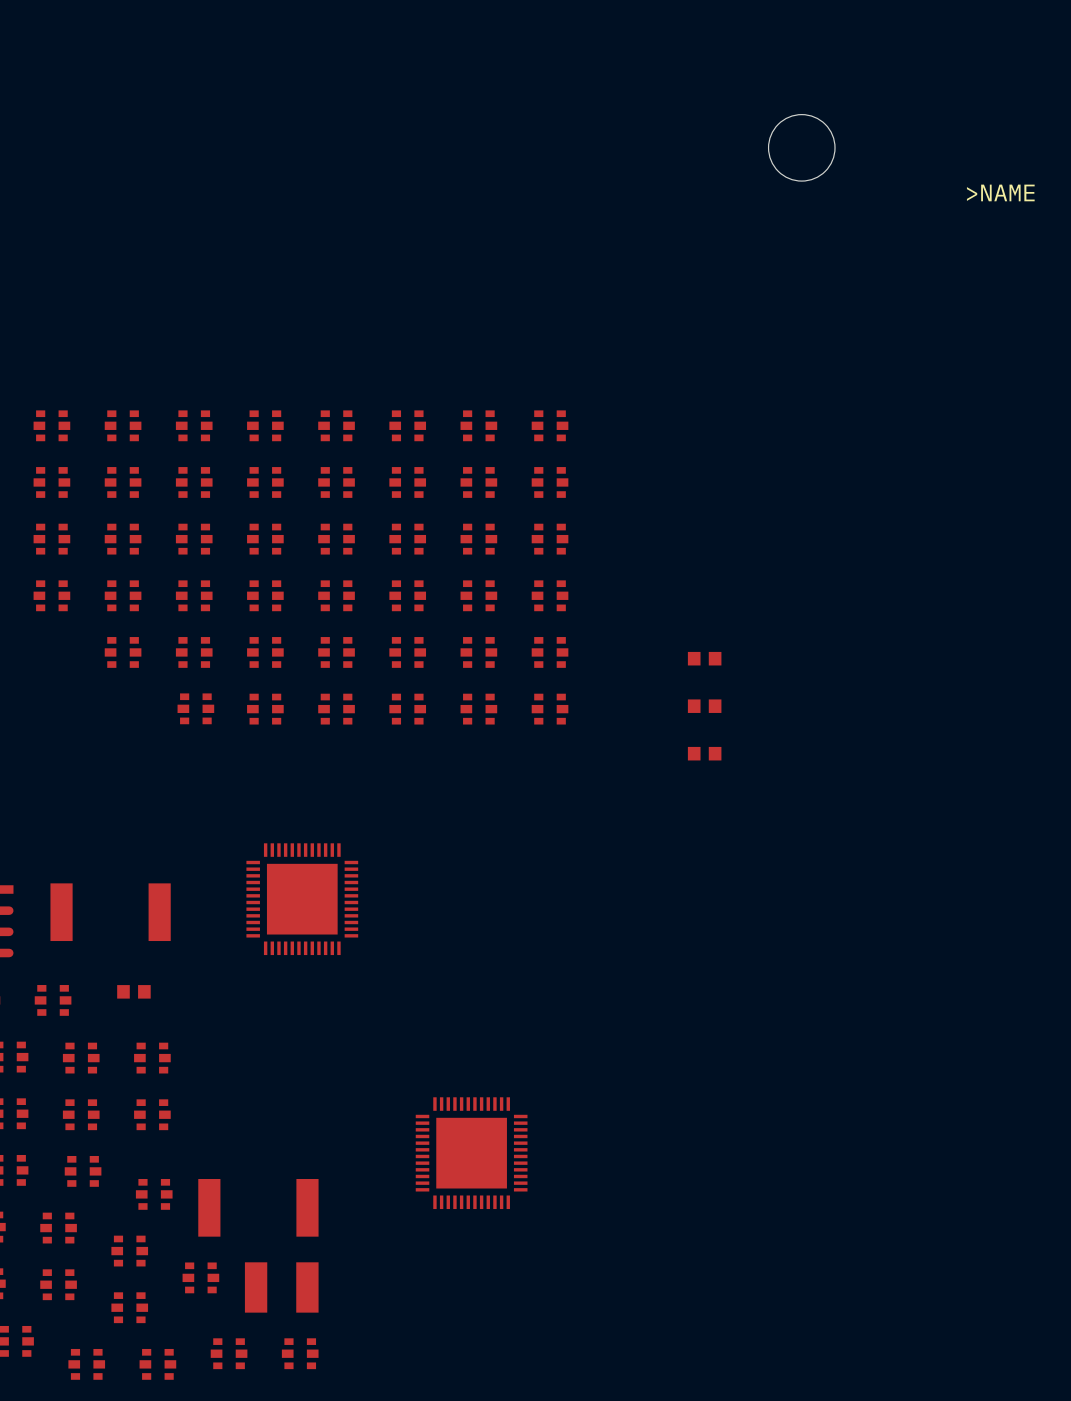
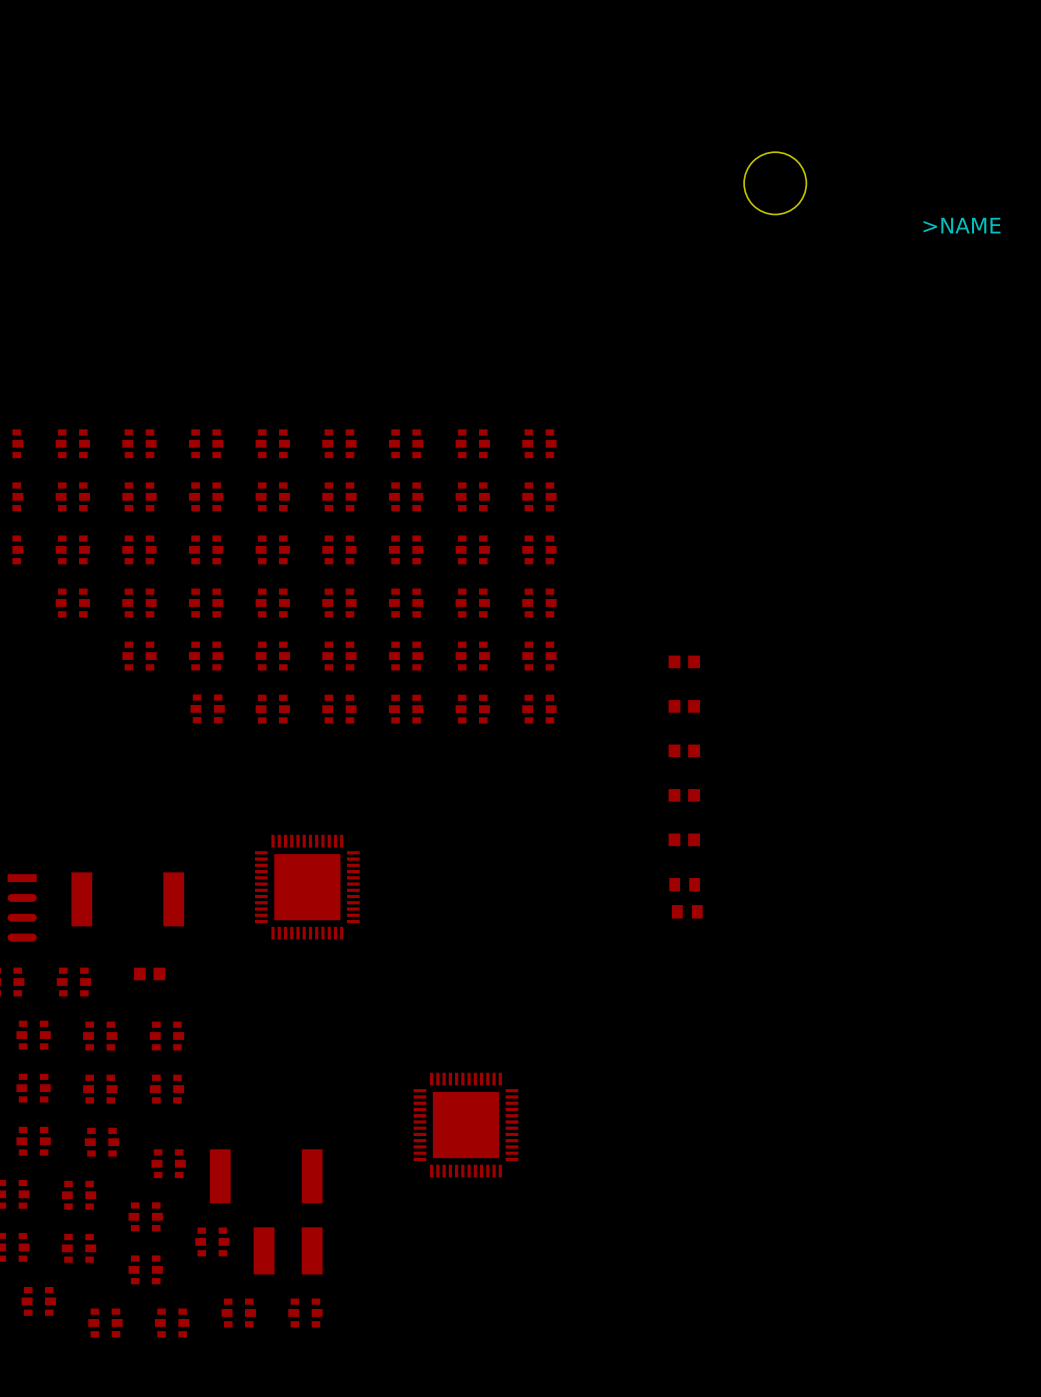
part: none -> (684, 795)
part: none -> (684, 839)
part: none -> (684, 884)
part: none -> (687, 911)

